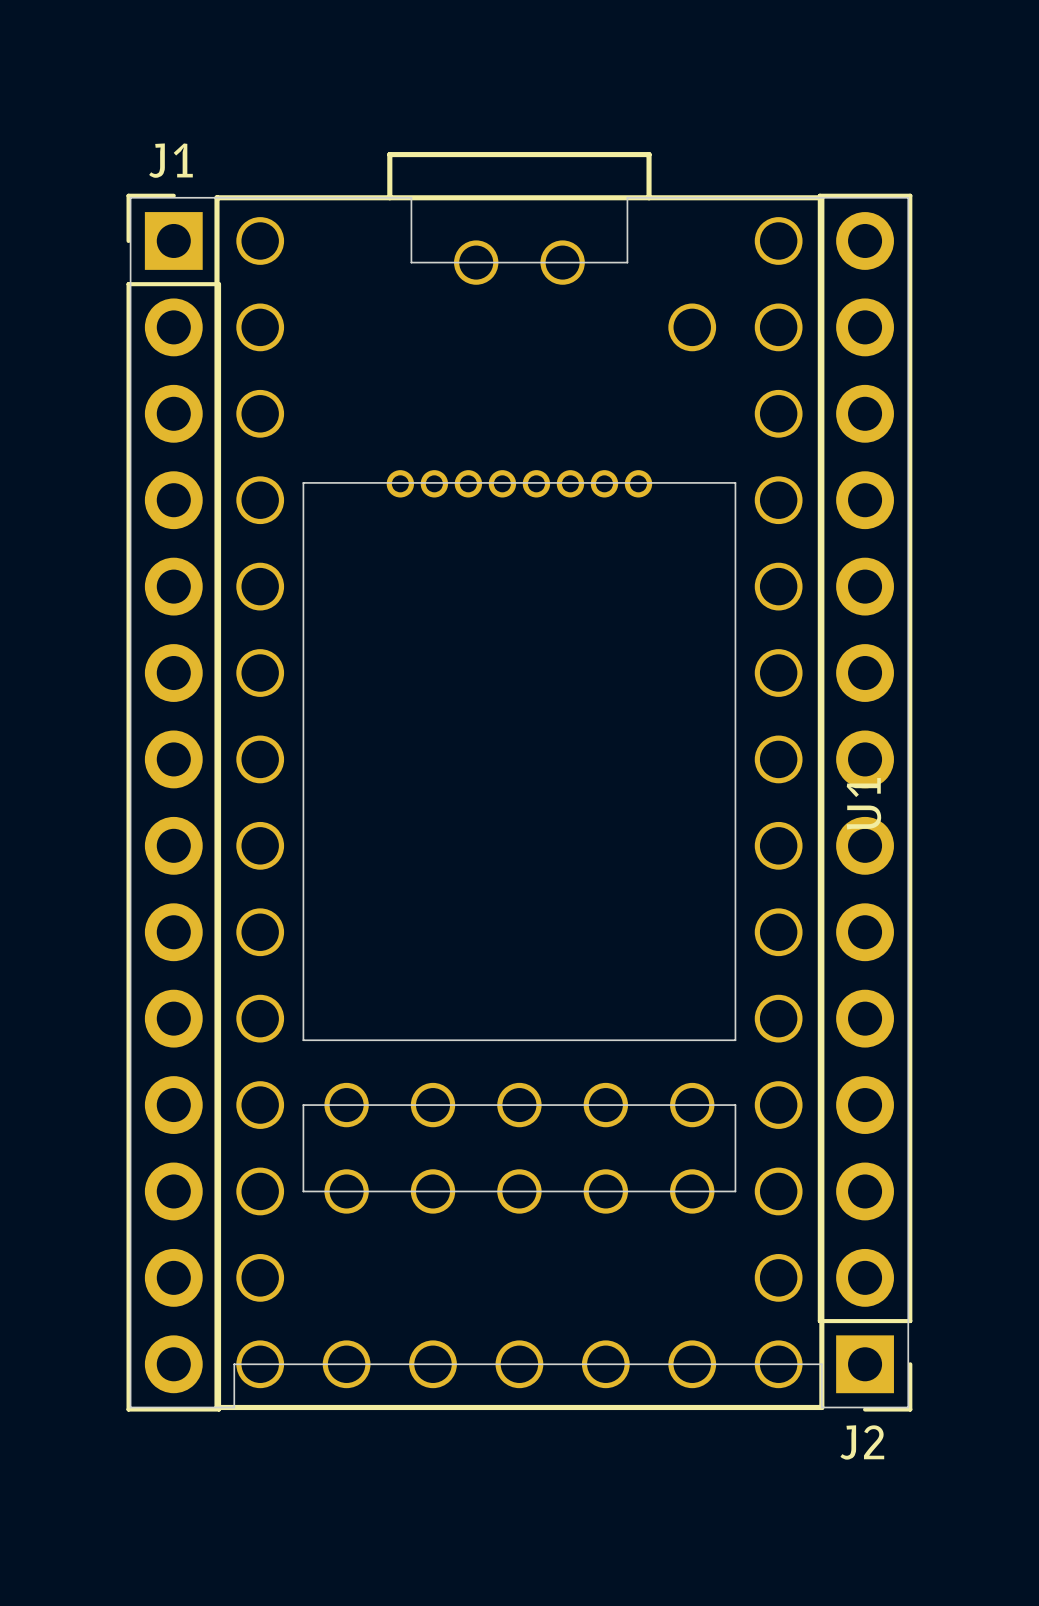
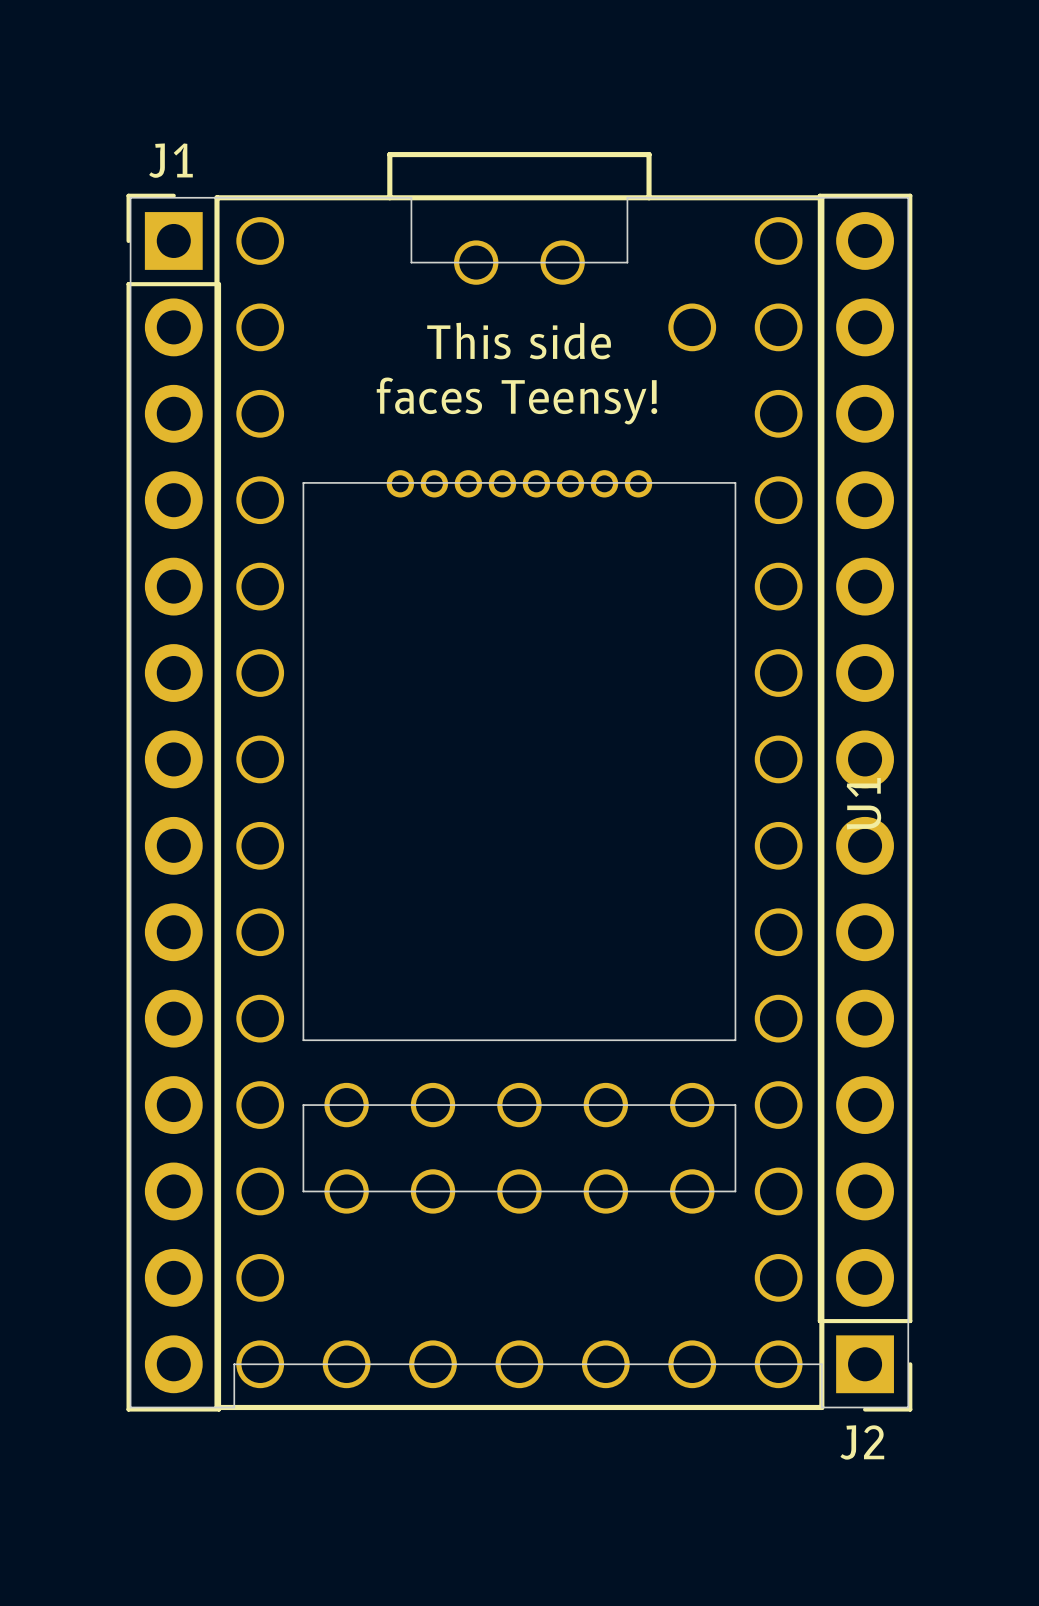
text: none -> This side (519, 341)
text: none -> faces Teensy! (516, 400)

